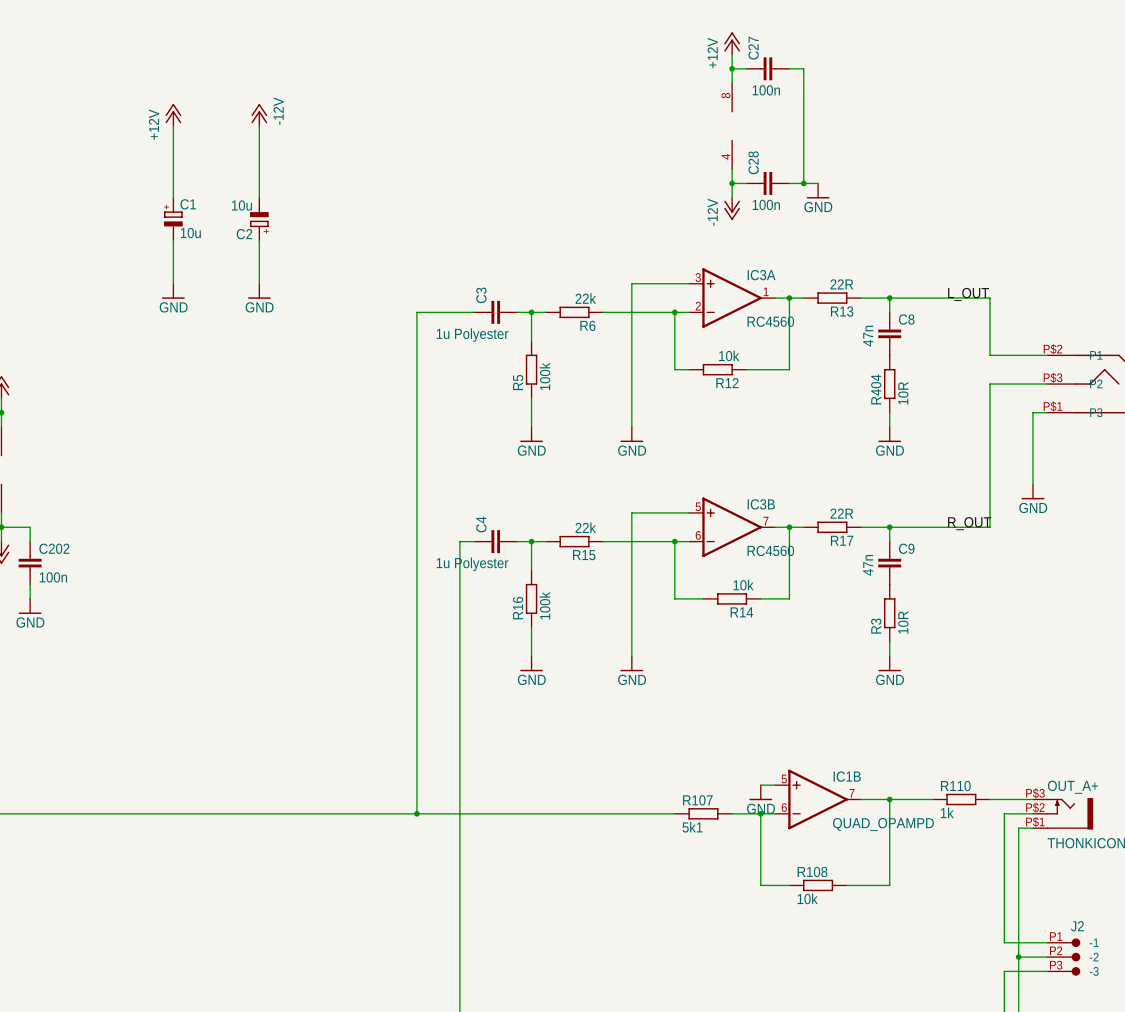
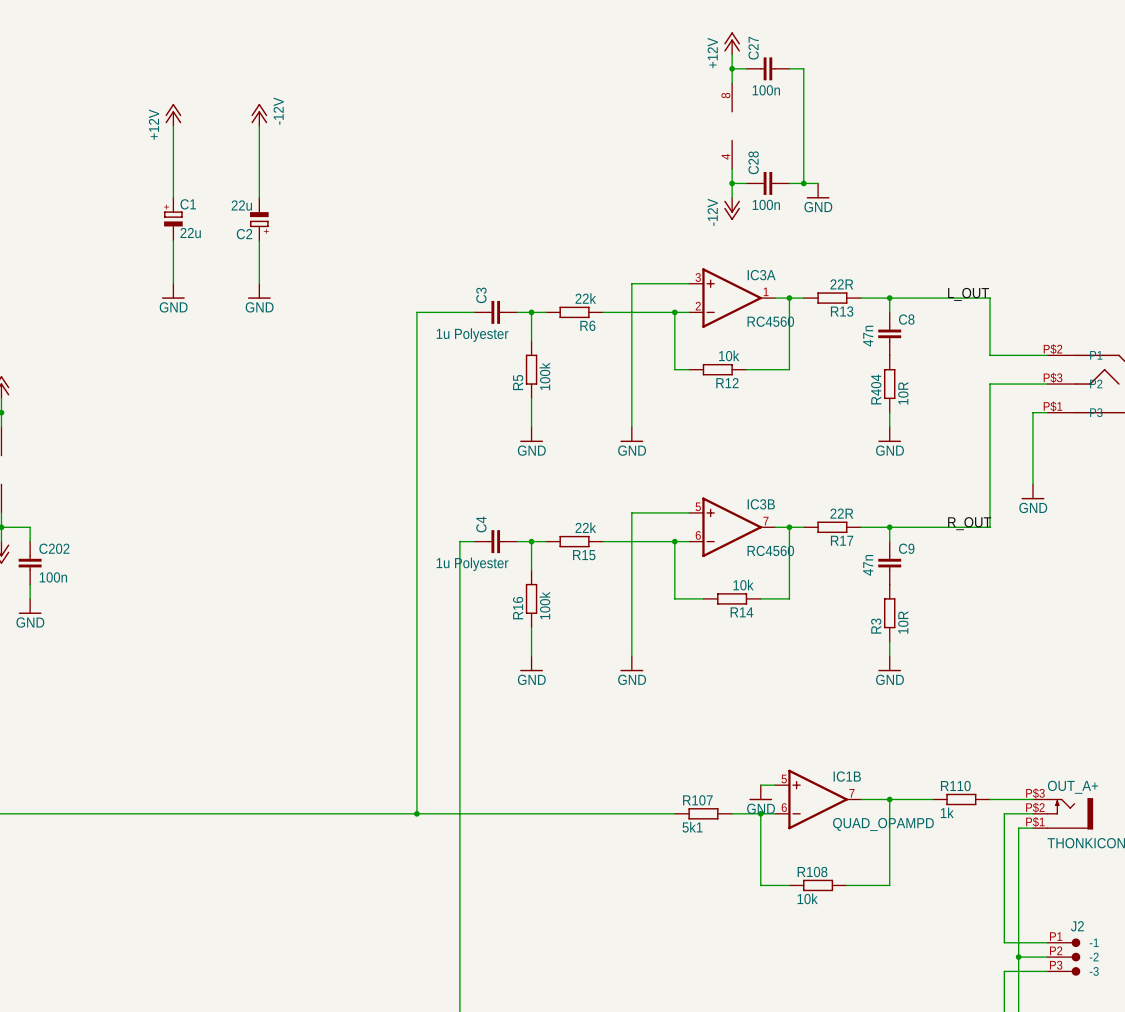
C2 value: 10u (242, 205) -> 22u (241, 205)
C1 value: 10u (190, 233) -> 22u (190, 233)

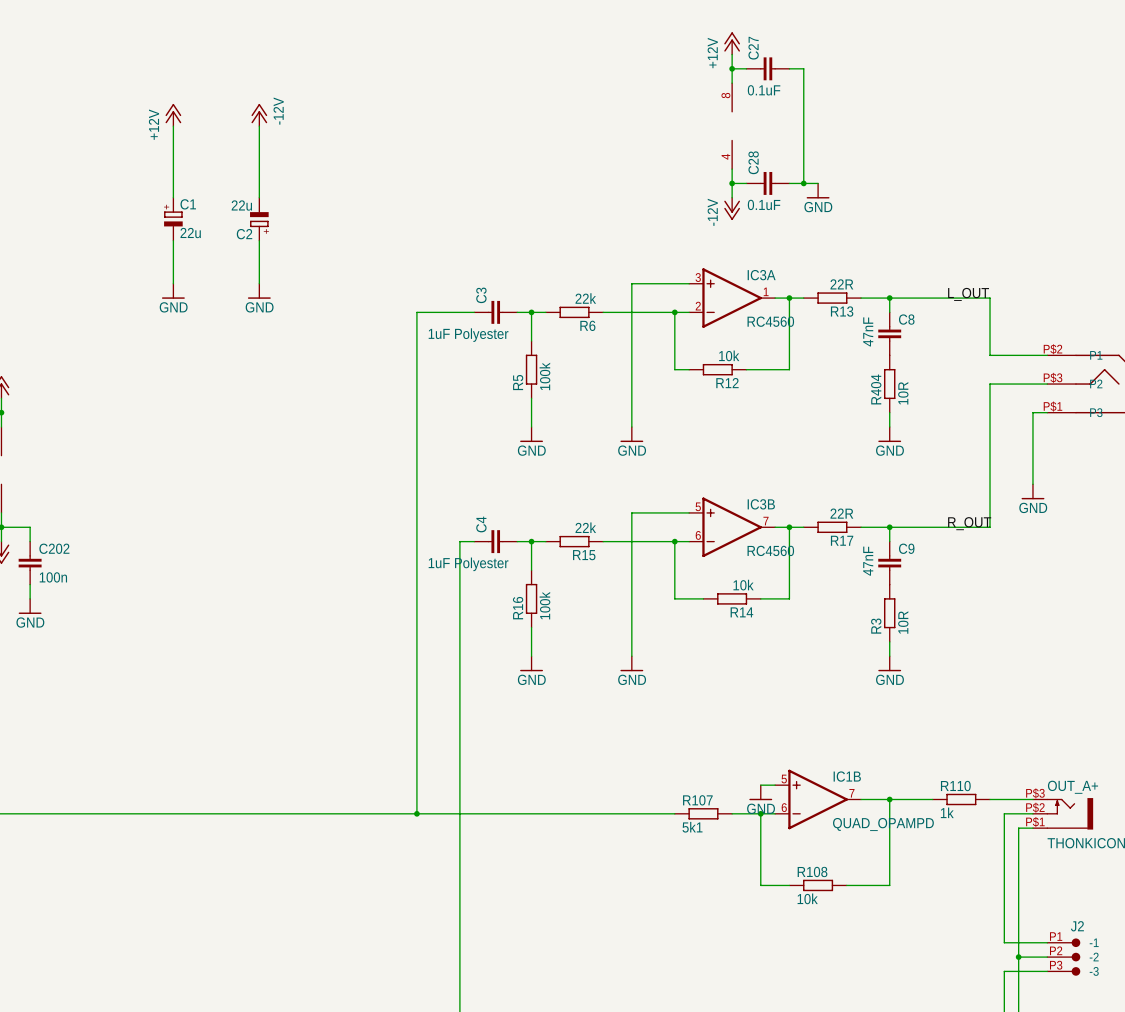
C27 value: 100n (766, 90) -> 0.1uF (764, 90)
C28 value: 100n (766, 204) -> 0.1uF (764, 204)
C3 value: 1u Polyester (472, 335) -> 1uF Polyester (468, 335)
C8 value: 47n (868, 336) -> 47nF (868, 331)
C4 value: 1u Polyester (472, 564) -> 1uF Polyester (468, 564)
C9 value: 47n (868, 565) -> 47nF (868, 561)

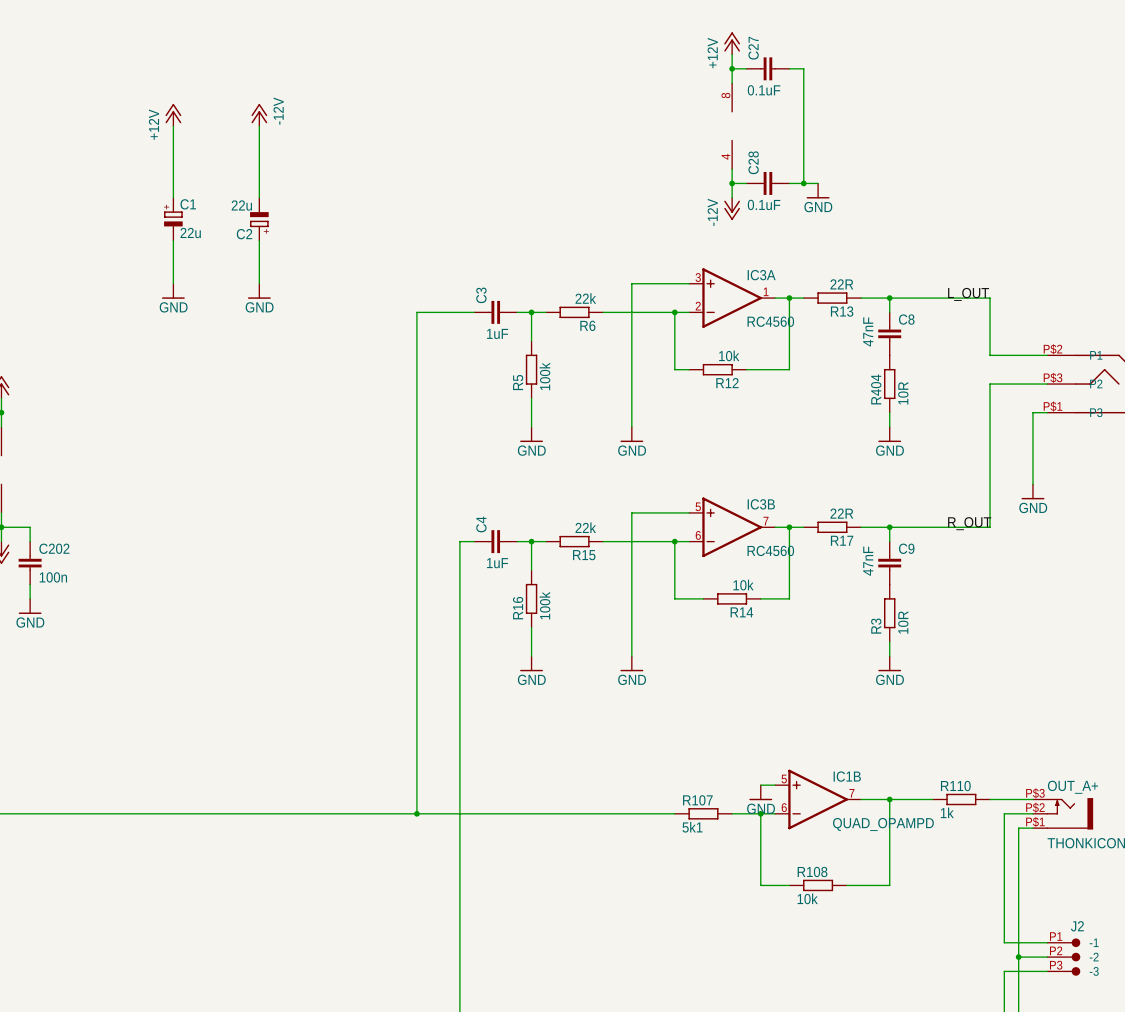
C3 value: 1uF Polyester (468, 335) -> 1uF (497, 333)
C4 value: 1uF Polyester (468, 564) -> 1uF (497, 563)

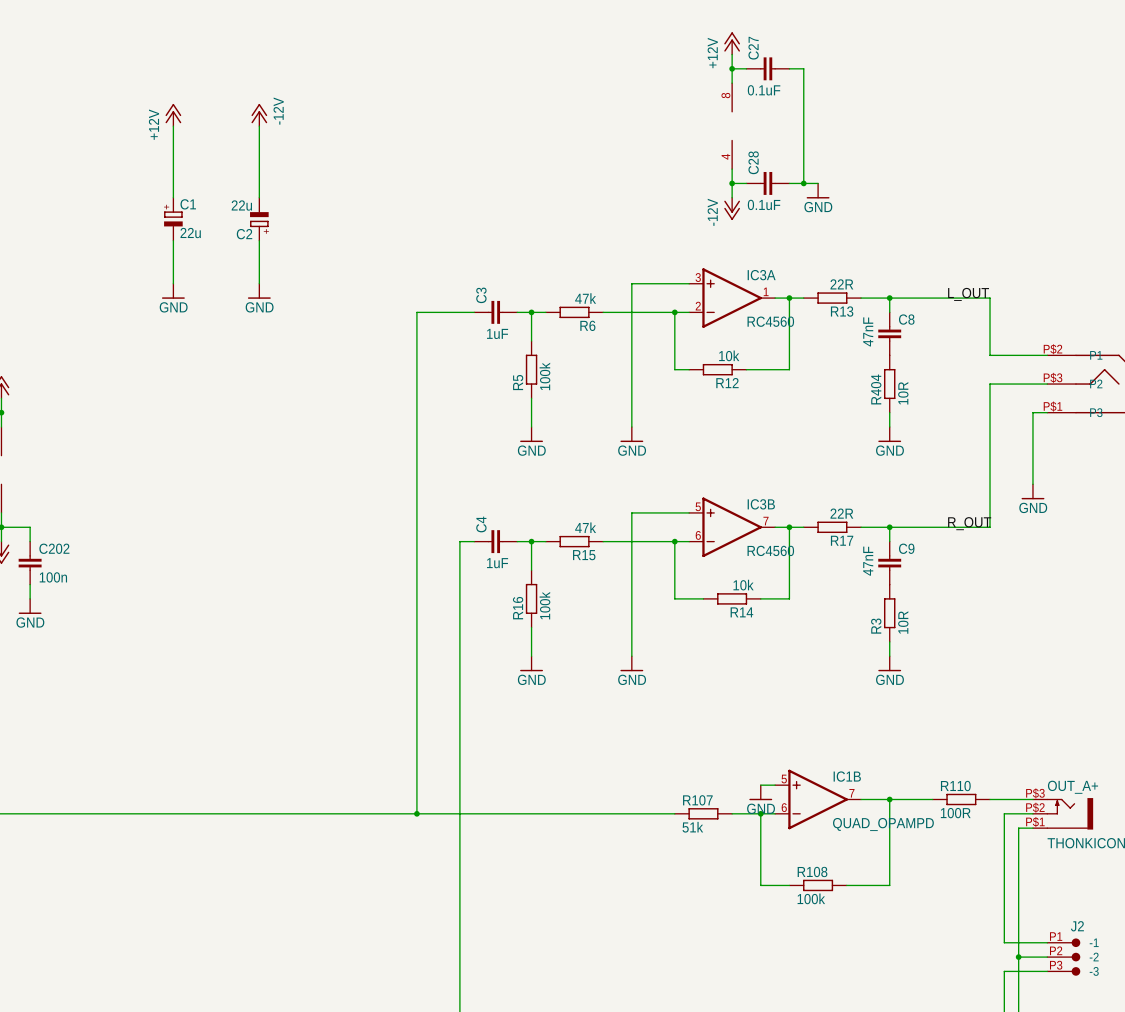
R6 value: 22k (585, 298) -> 47k (585, 298)
R15 value: 22k (585, 527) -> 47k (585, 527)
R110 value: 1k (947, 812) -> 100R (955, 813)
R107 value: 5k1 (692, 827) -> 51k (692, 827)
R108 value: 10k (807, 898) -> 100k (811, 898)

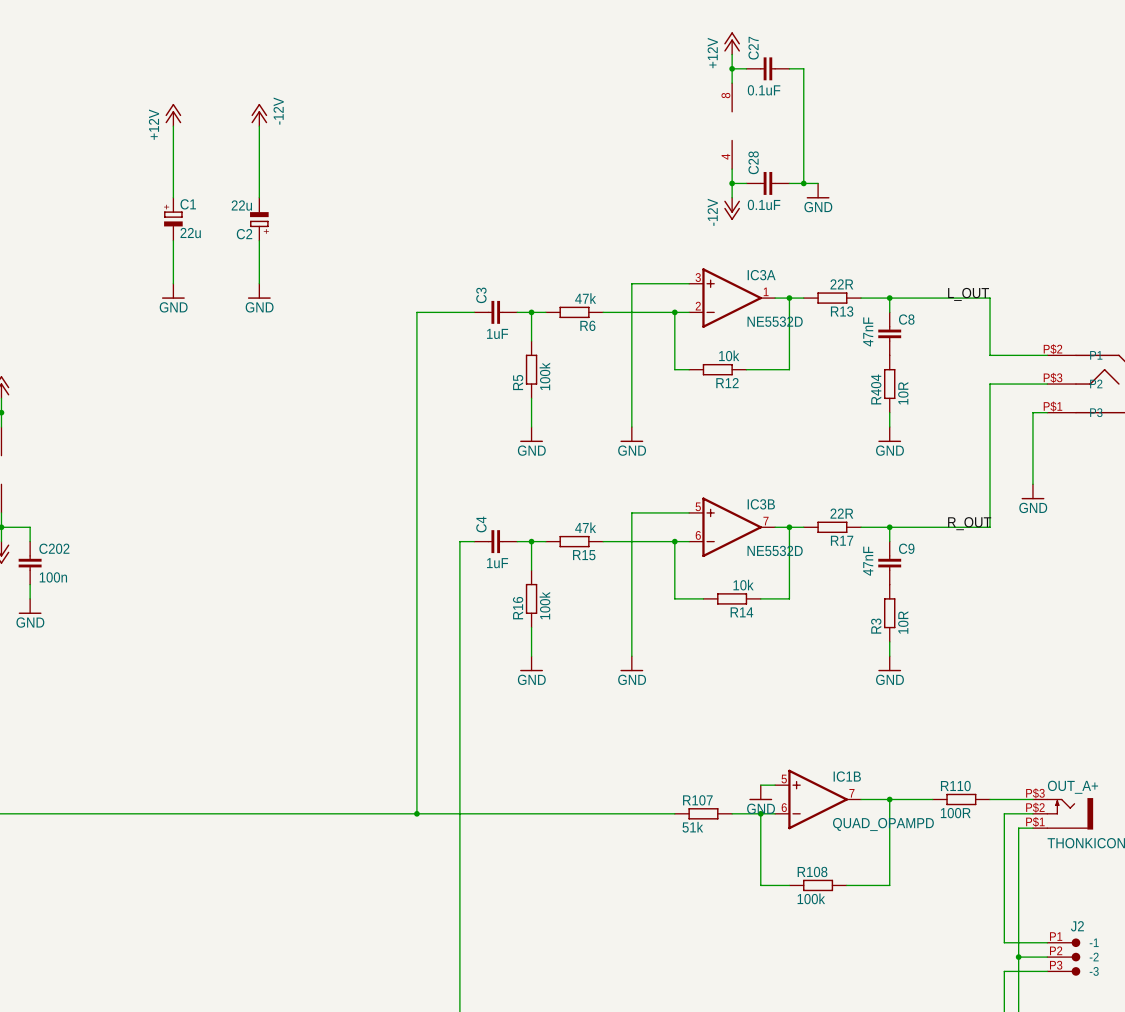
IC3A value: RC4560 (770, 321) -> NE5532D (775, 321)
IC3B value: RC4560 (770, 550) -> NE5532D (775, 550)

